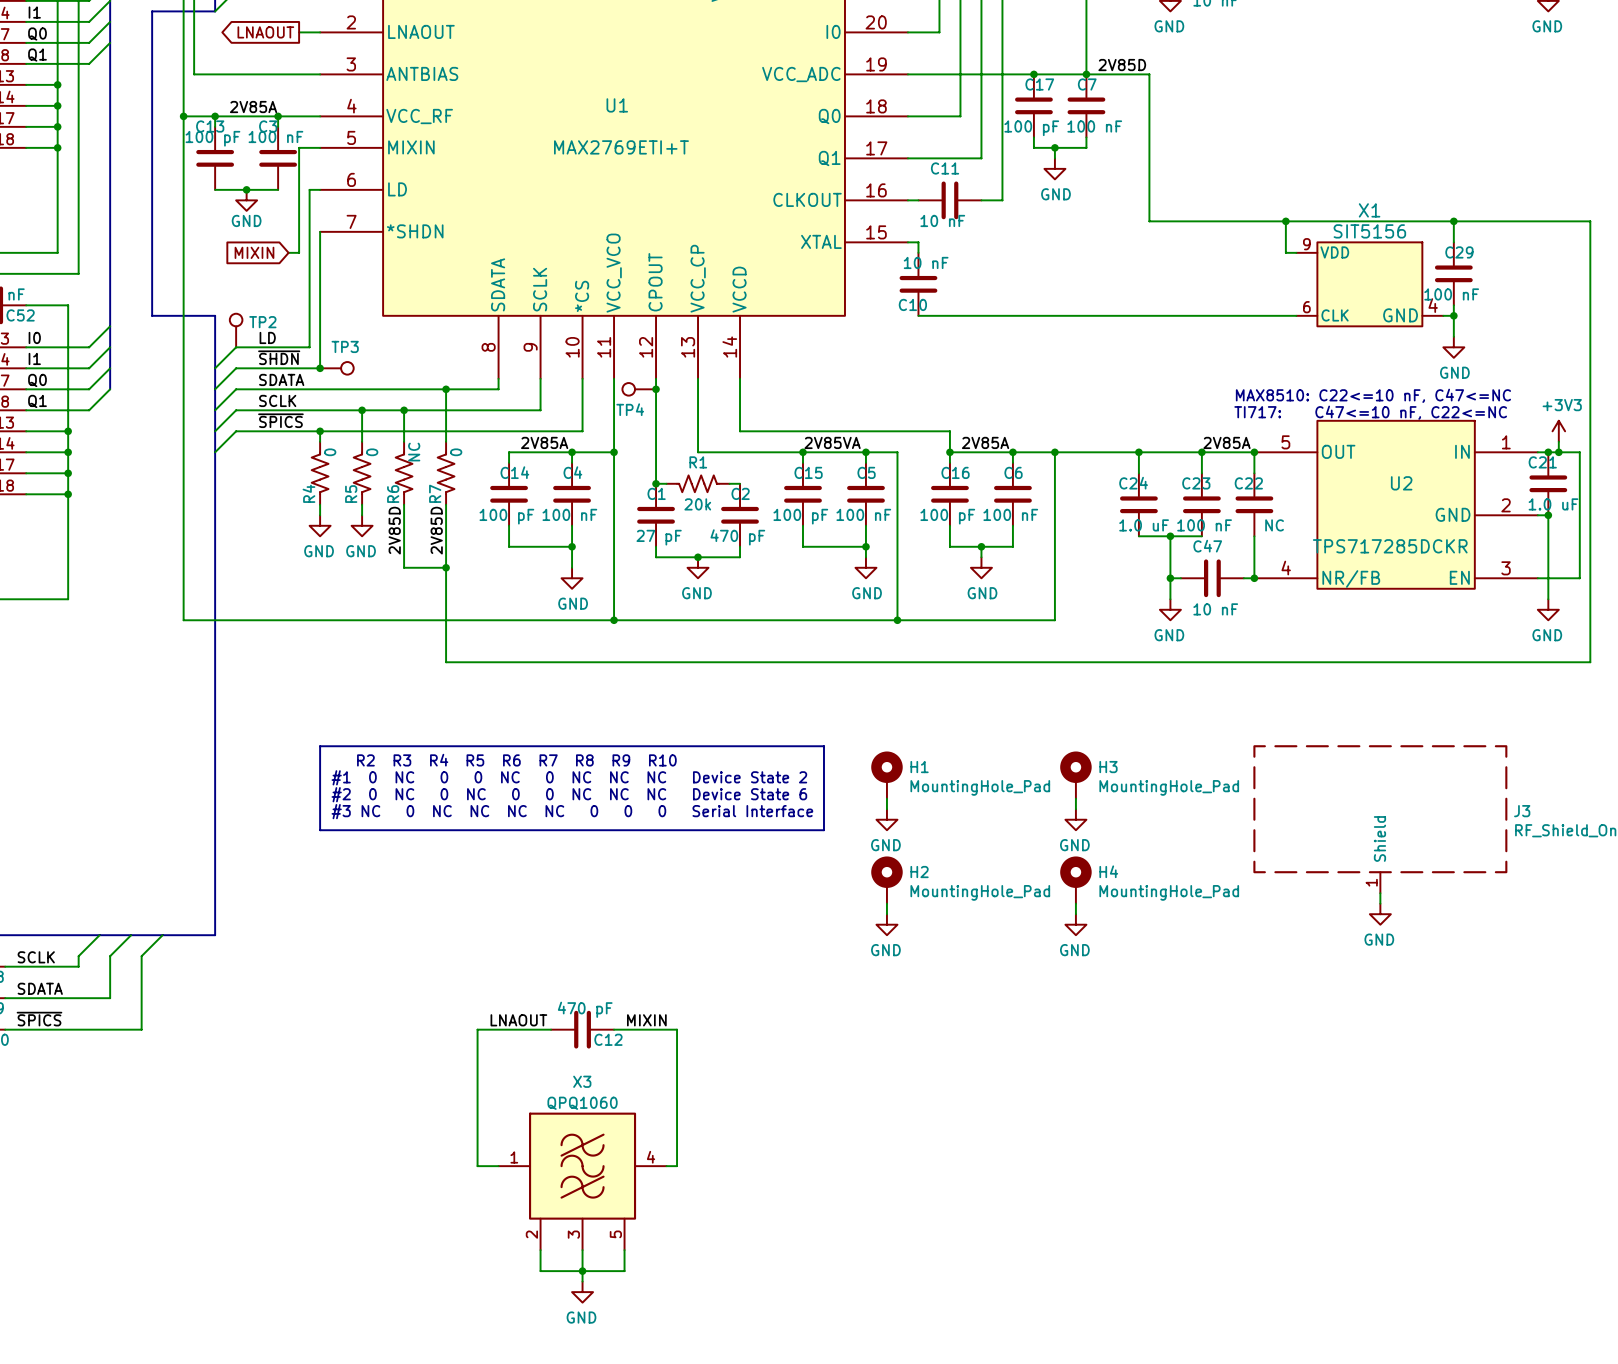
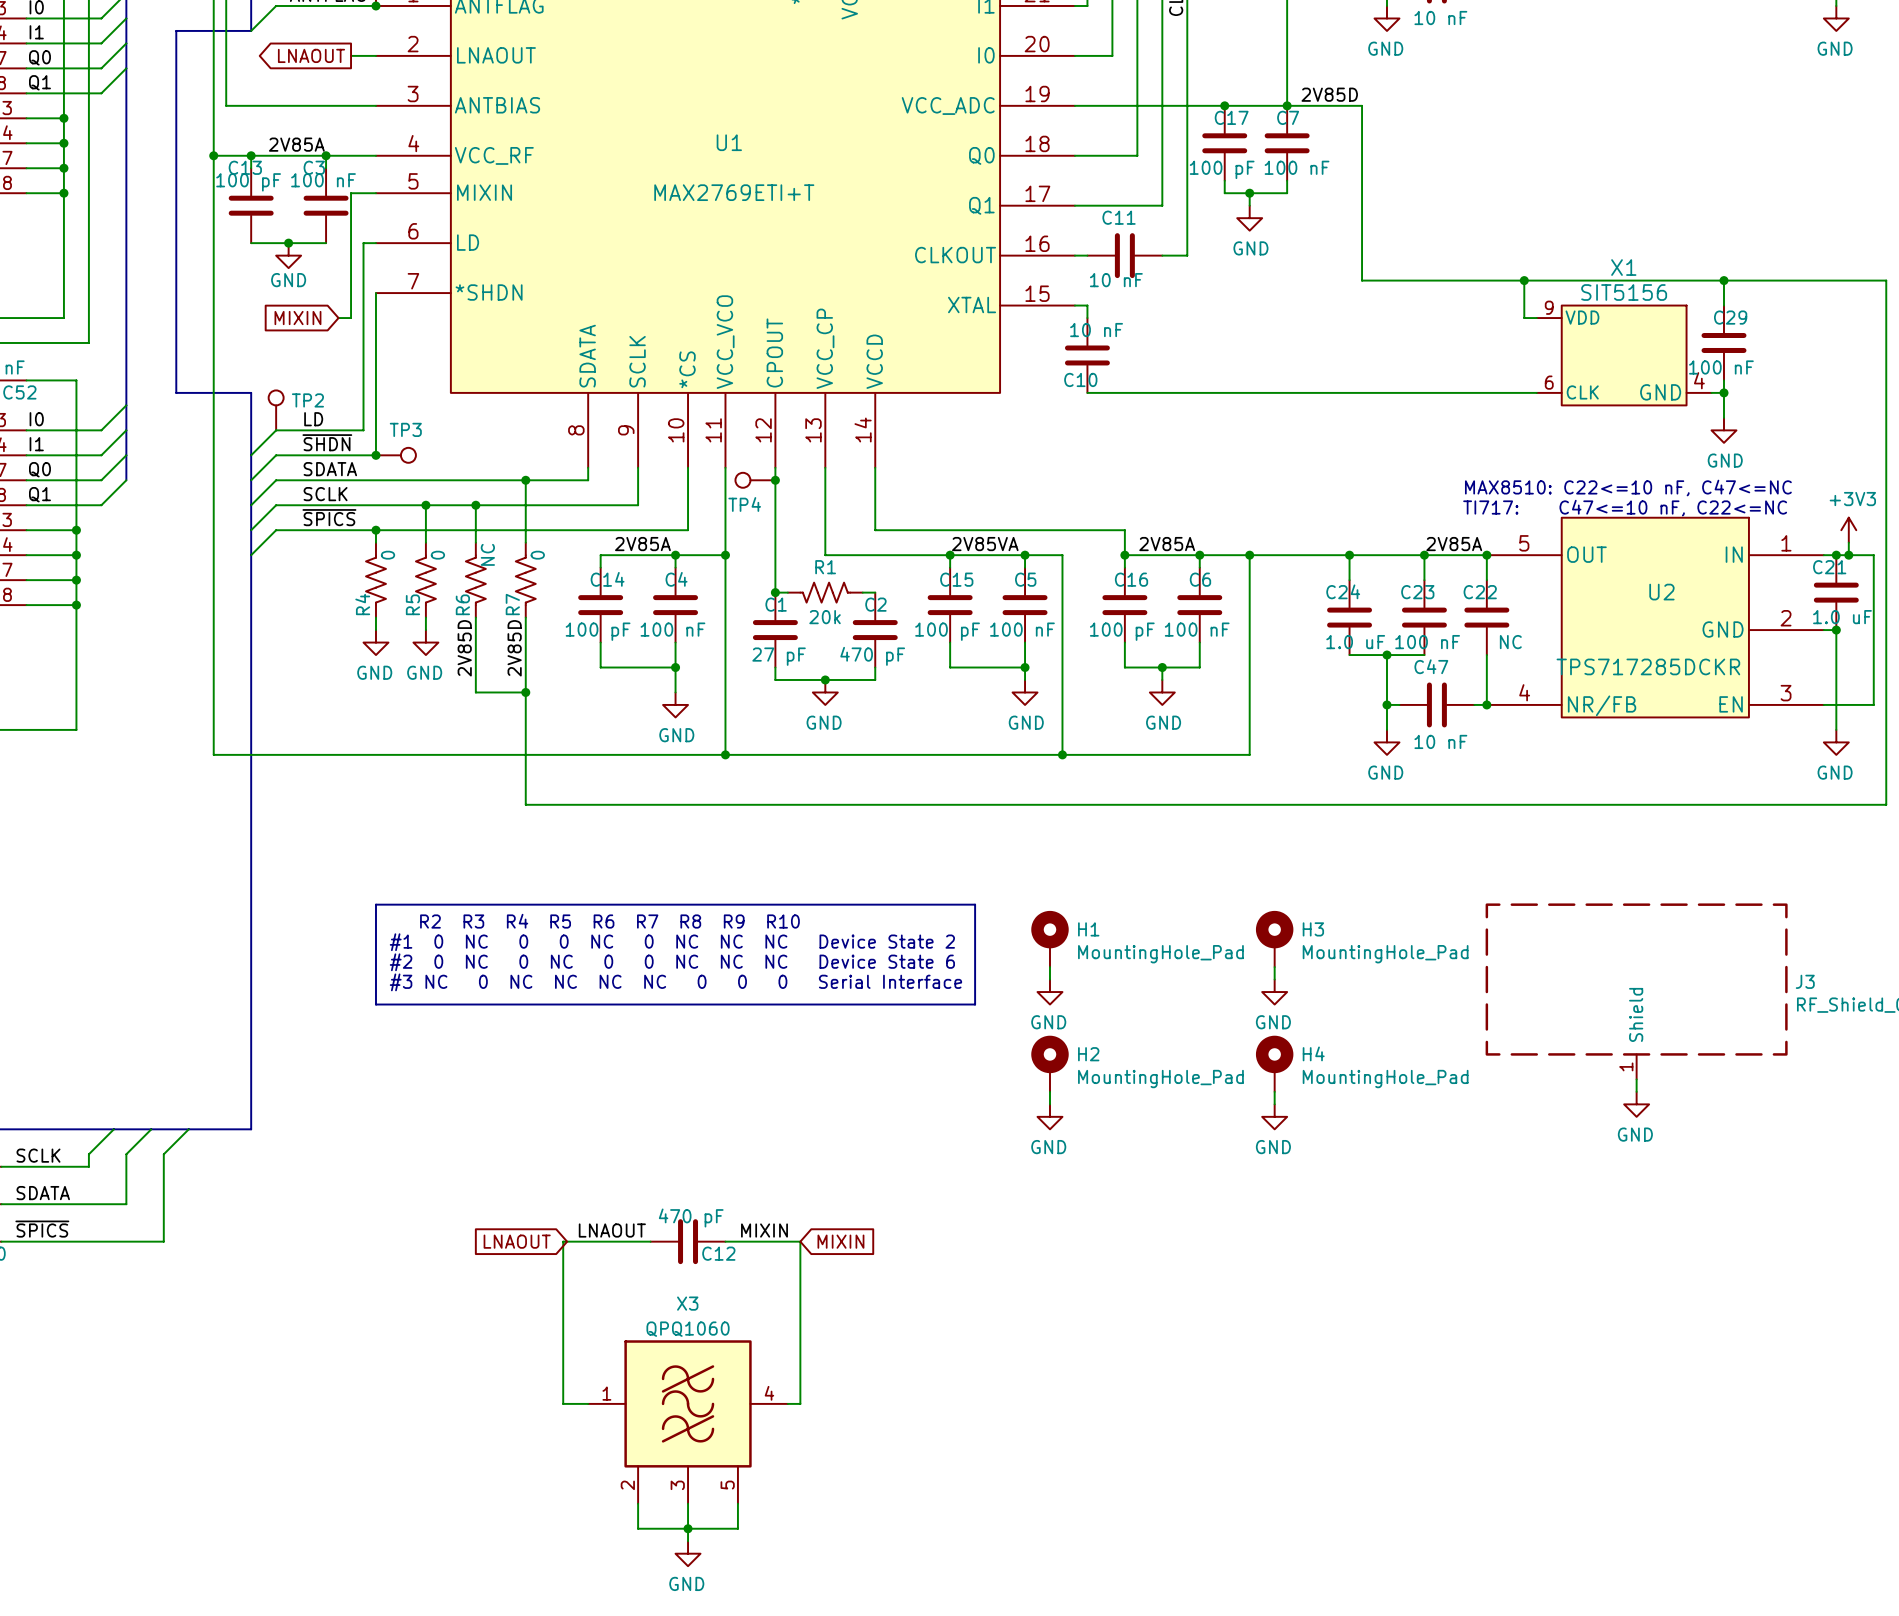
global label: none -> LNAOUT (517, 1241)
global label: none -> MIXIN (840, 1241)

